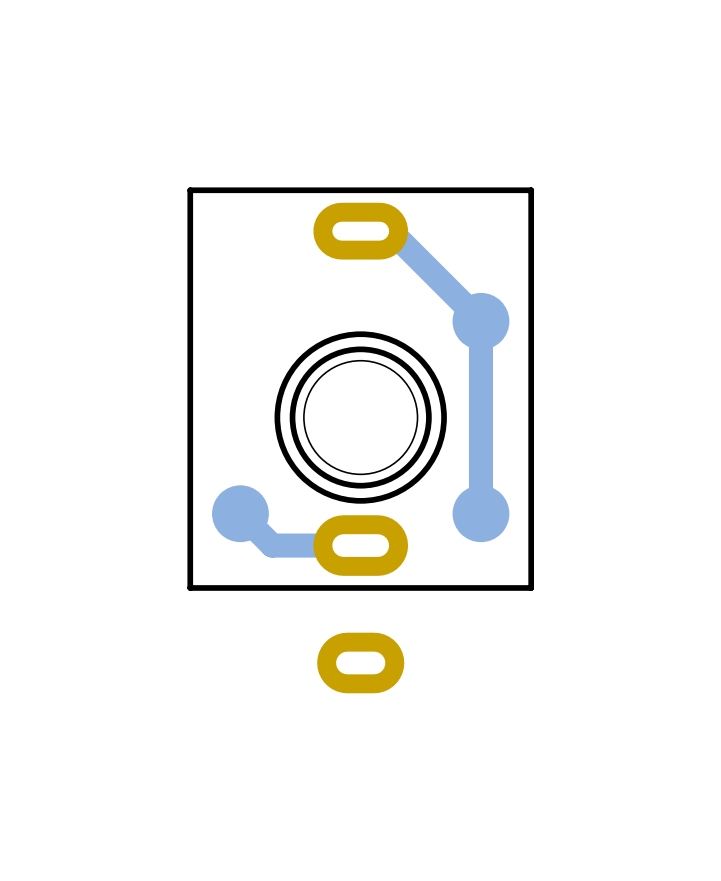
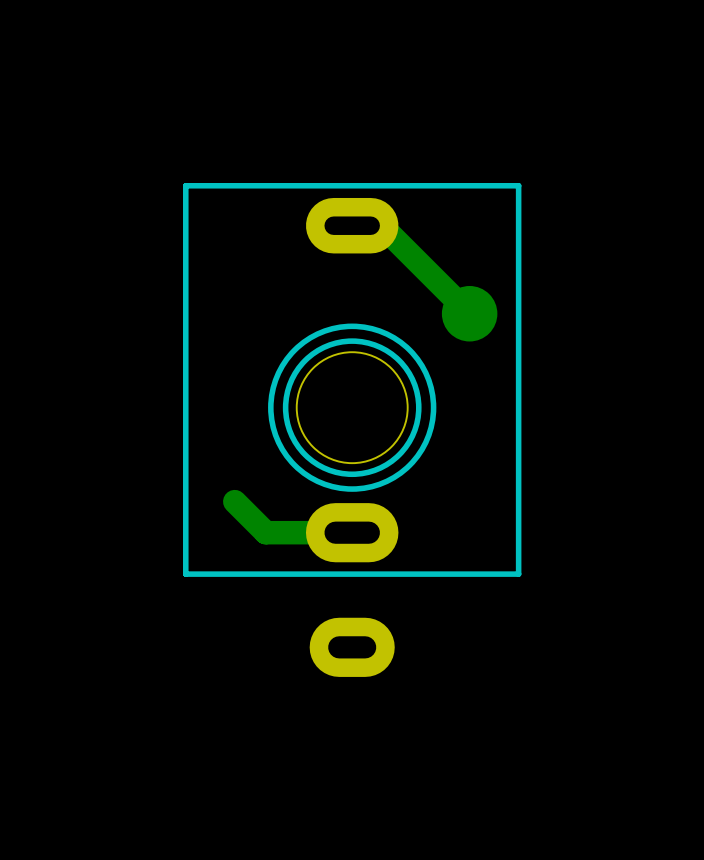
bottom track: (480, 321) (480, 513) -> none
part: (240, 513) -> none
part: (480, 513) -> none

